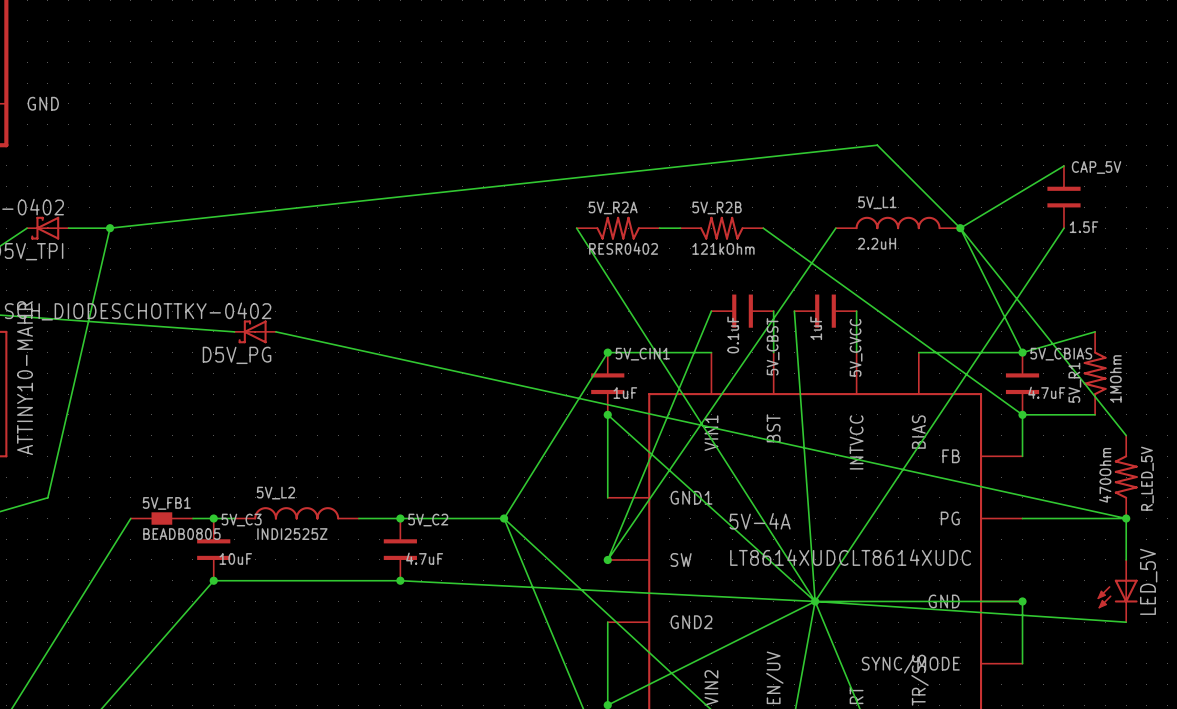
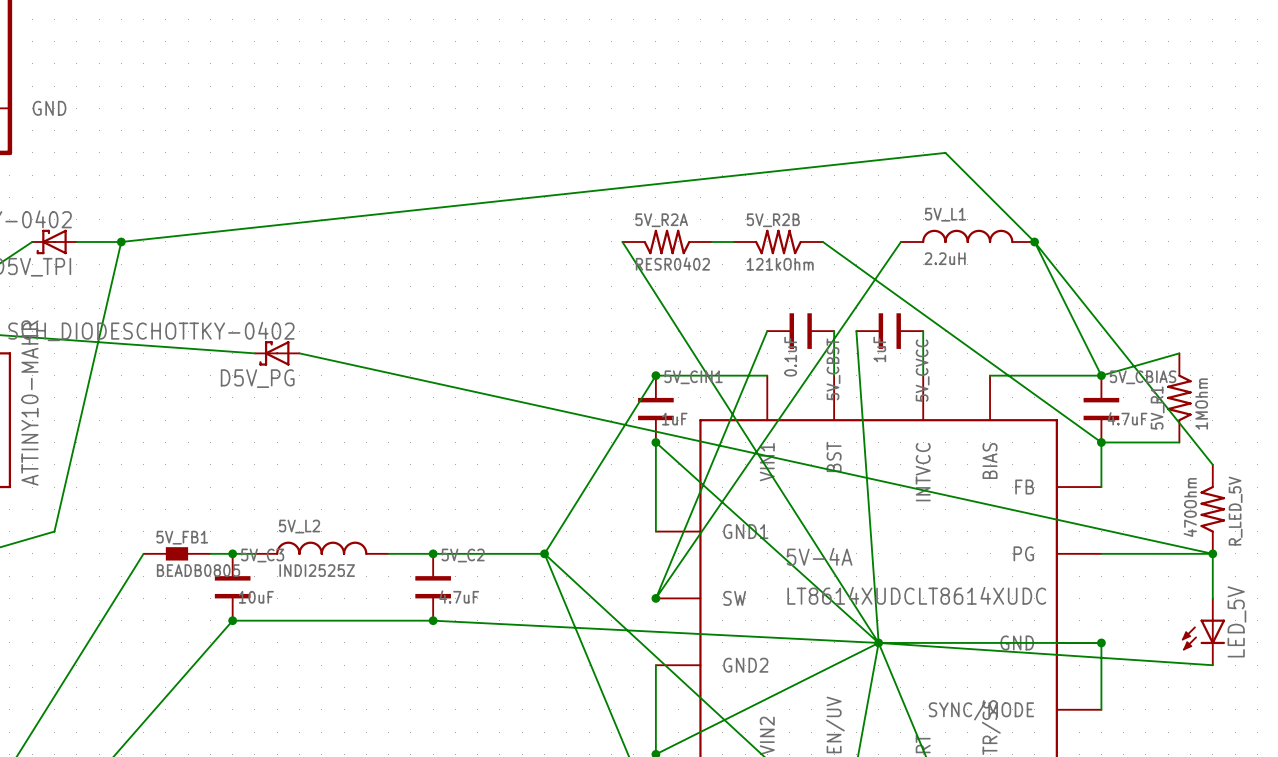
wire: (1063, 165) (960, 228) -> none
CAP_5V: 1.5F (1063, 197) -> none
wire: (1063, 228) (815, 601) -> none

